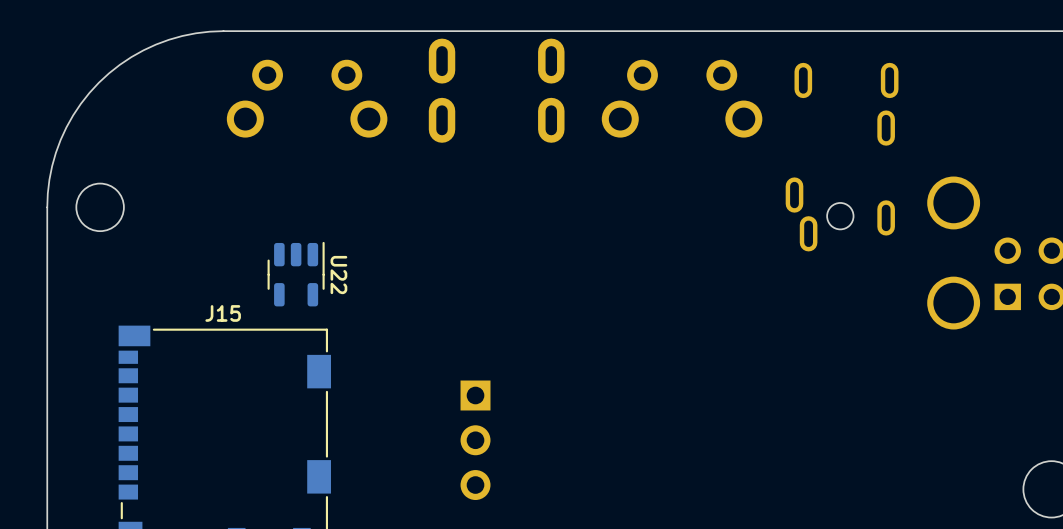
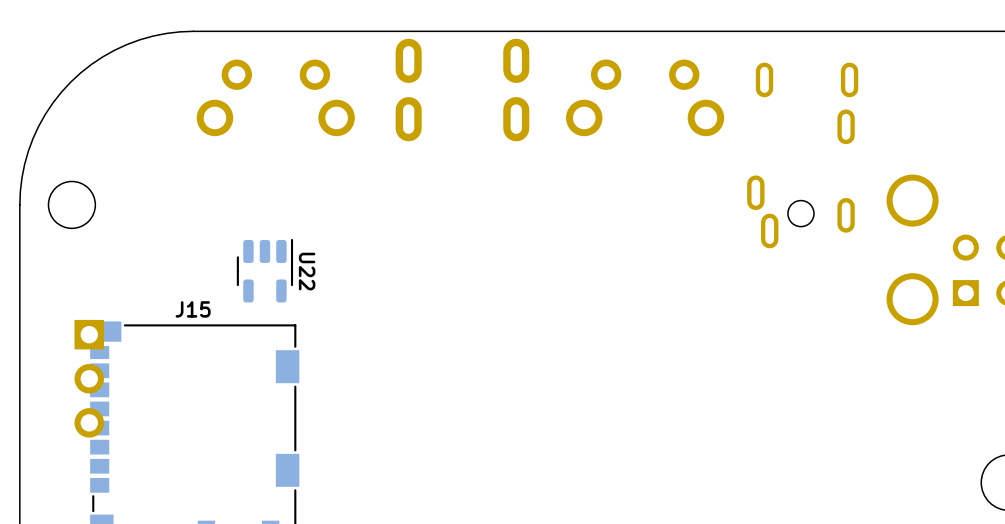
part position: (475, 440) -> (89, 378)

